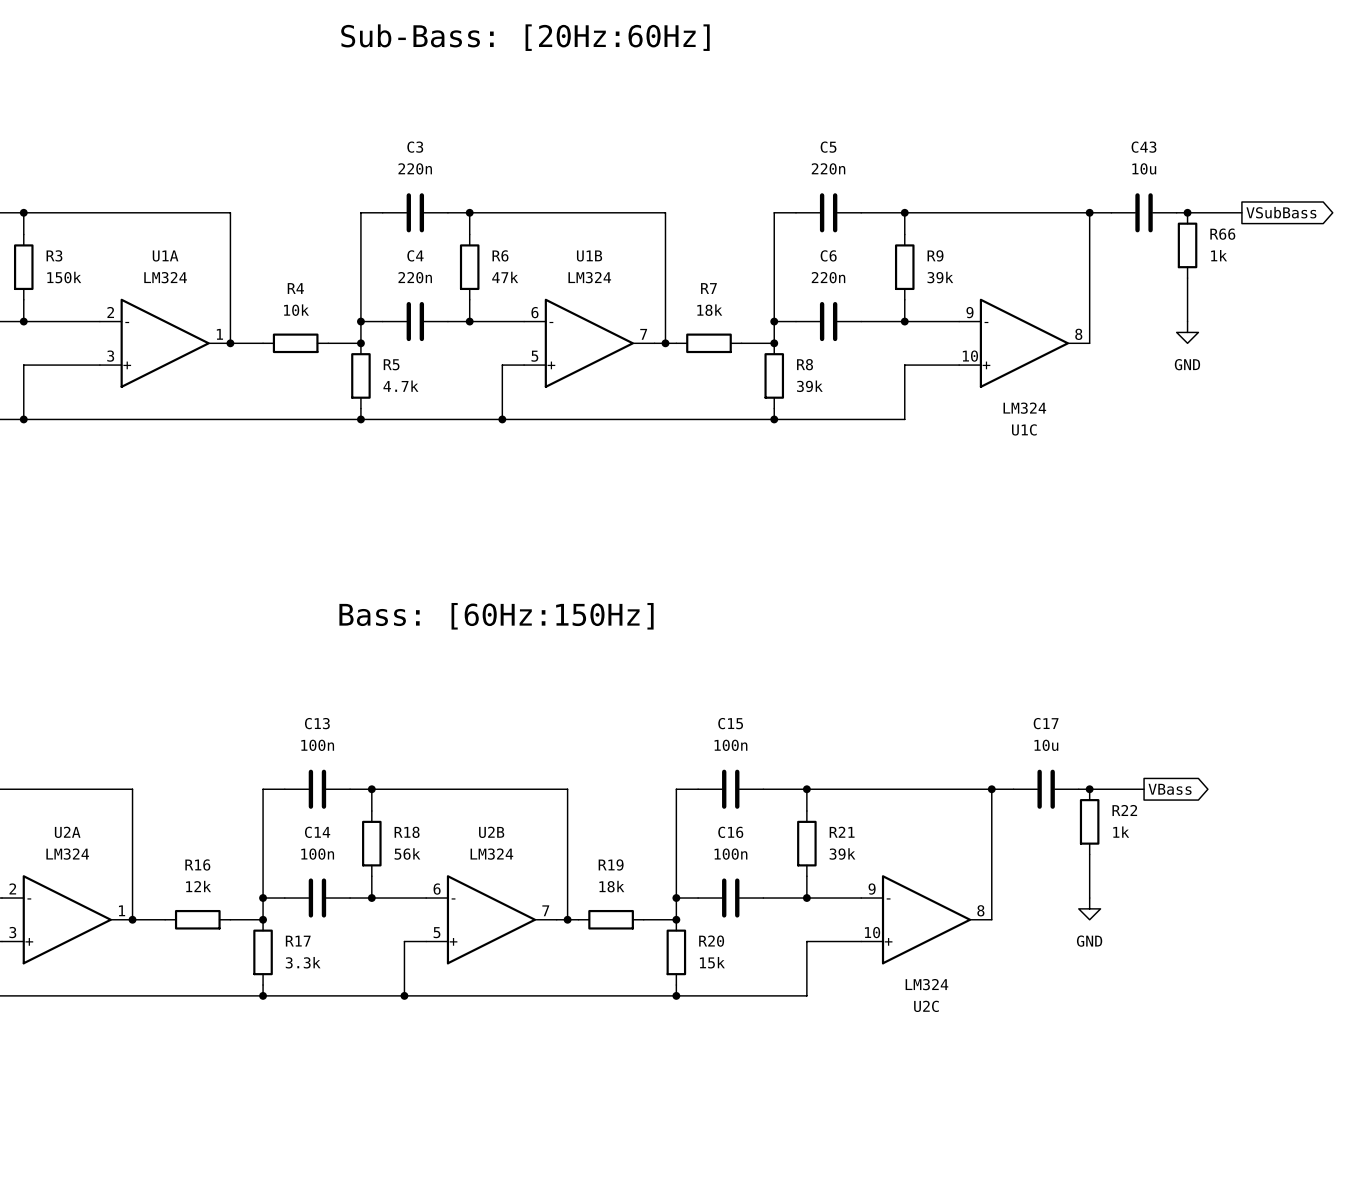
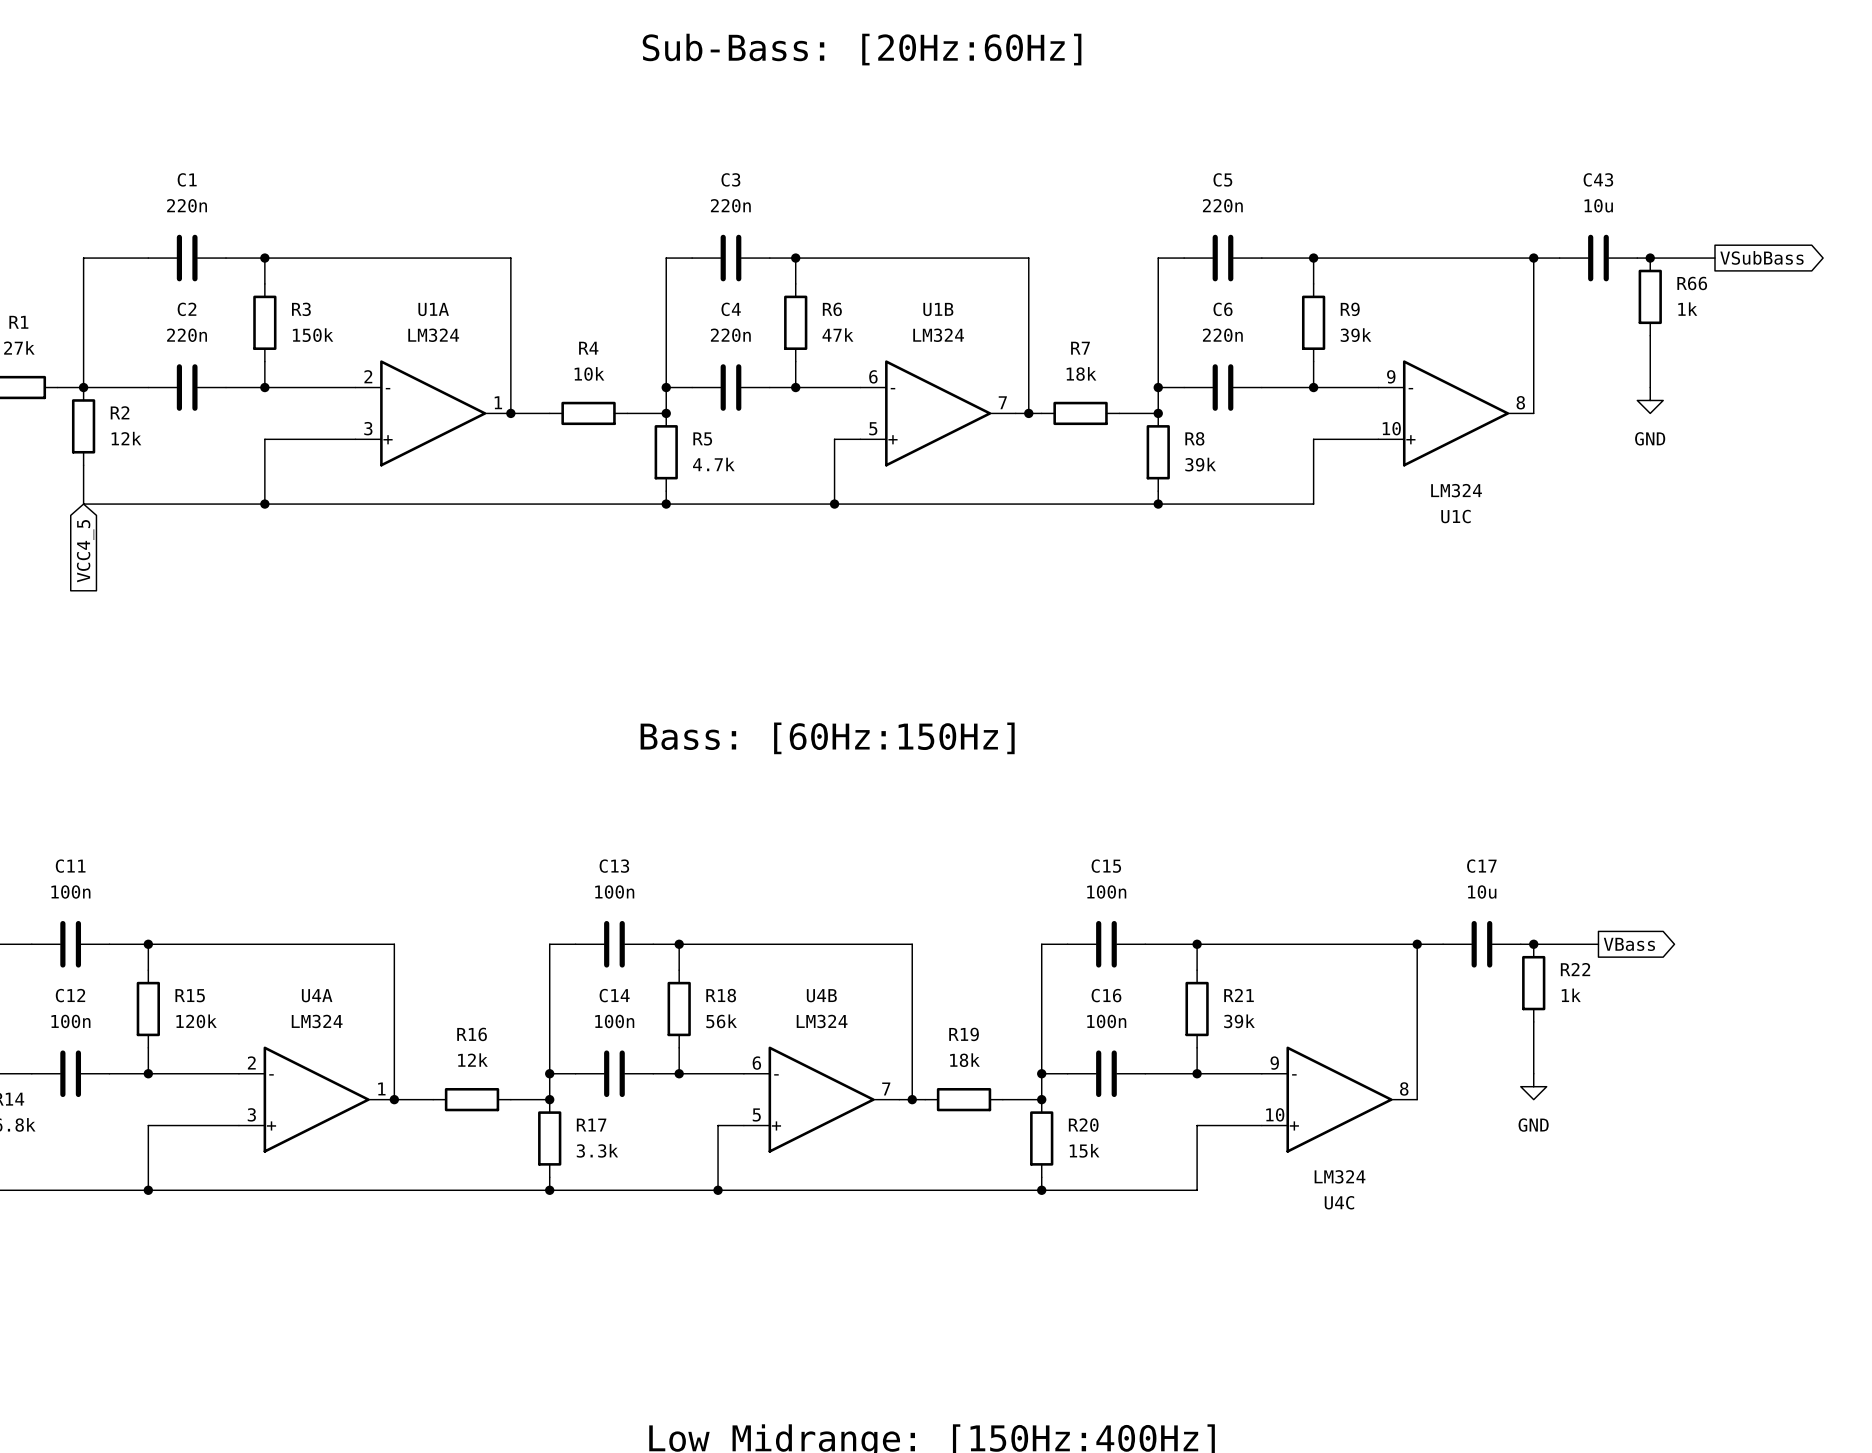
U2A name: U2A (67, 832) -> U4A (317, 995)
U2B name: U2B (491, 832) -> U4B (821, 995)
U2C name: U2C (926, 1006) -> U4C (1339, 1202)

